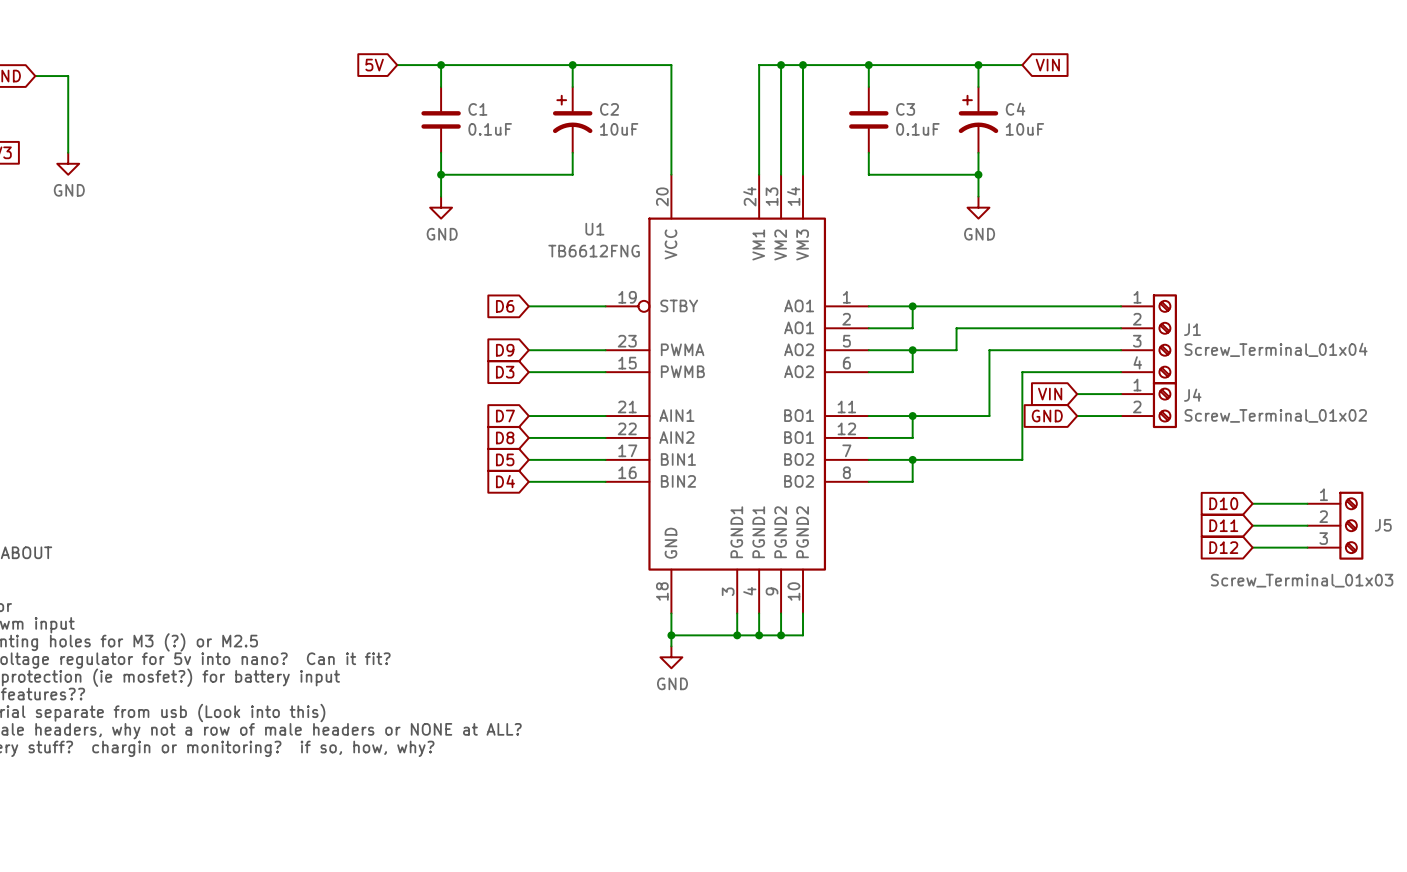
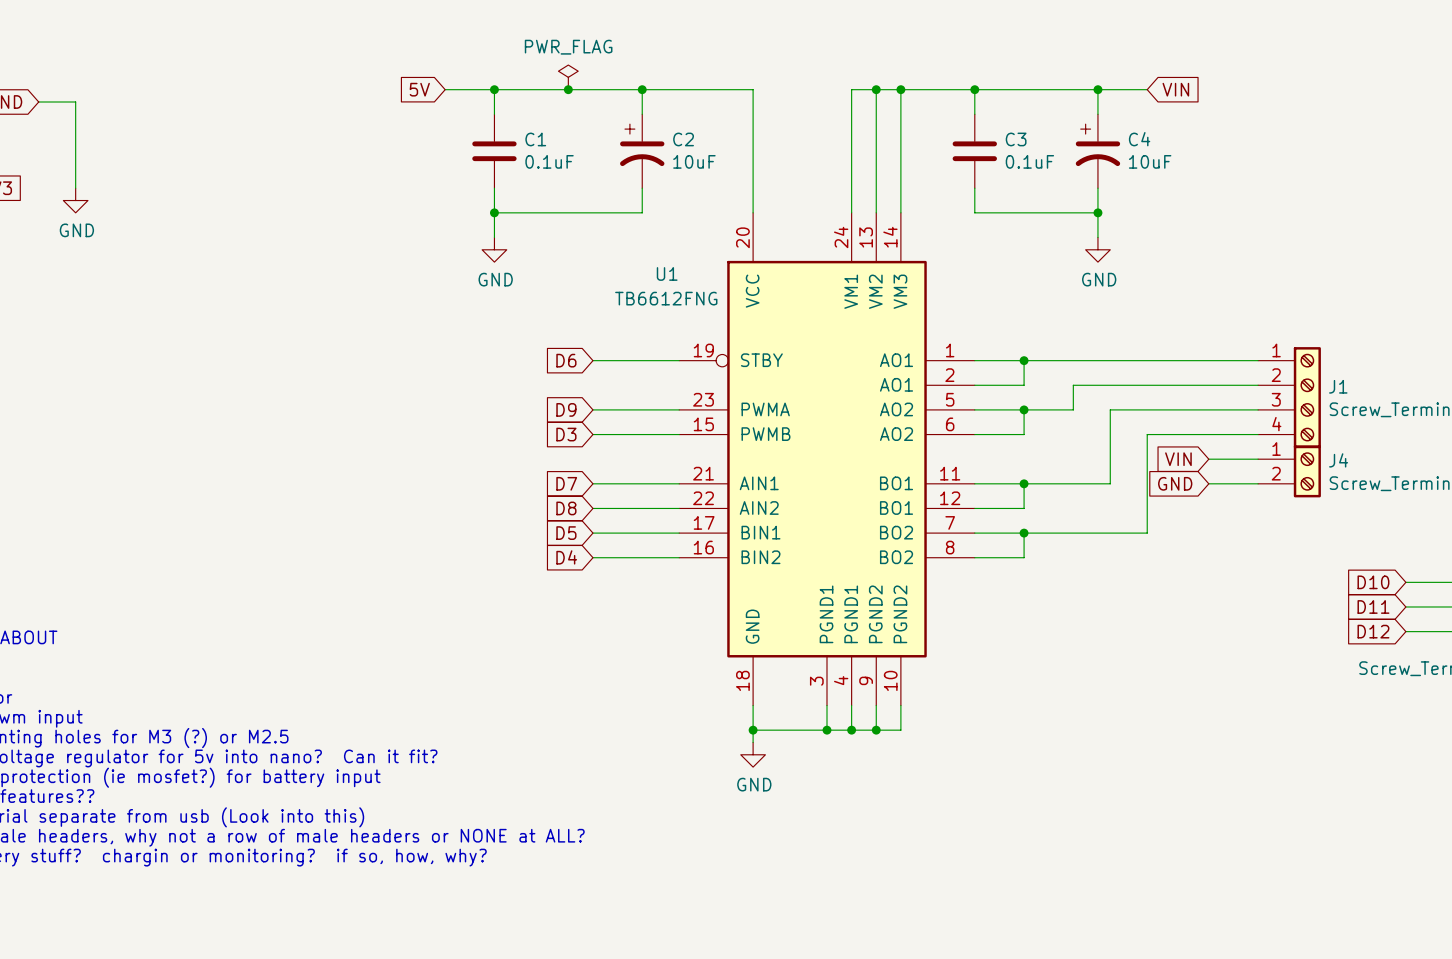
power symbol: none -> PWR_FLAG (568, 77)
junction: none -> (568, 89)

